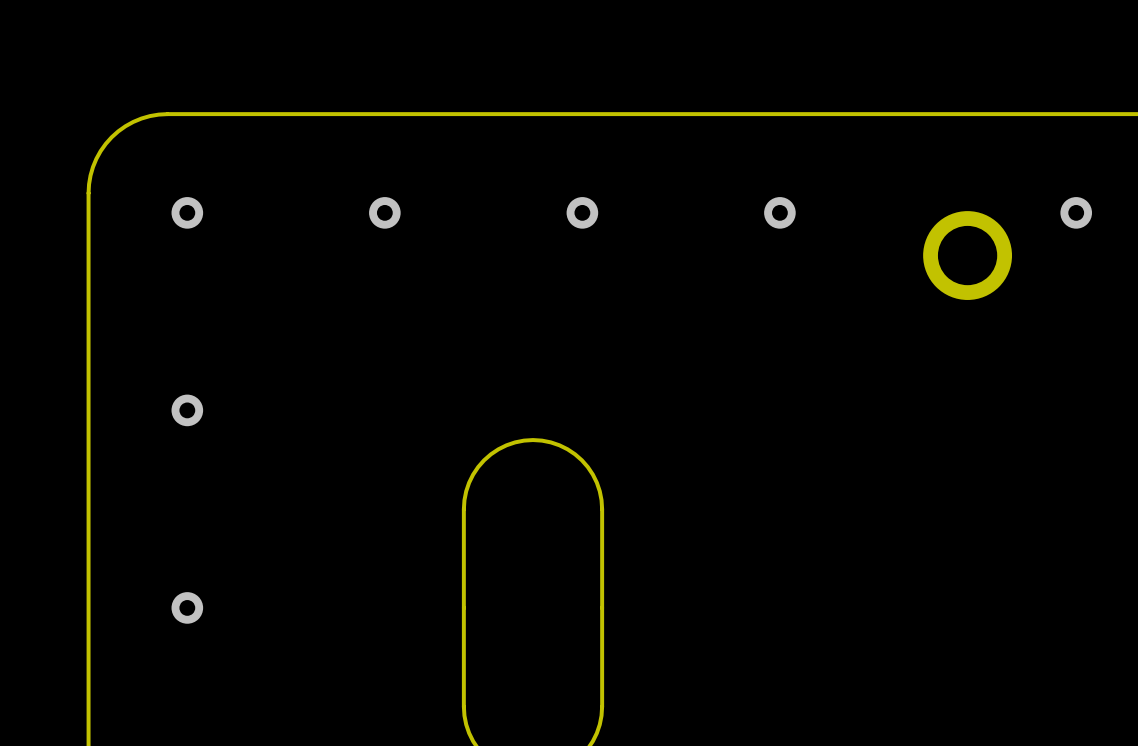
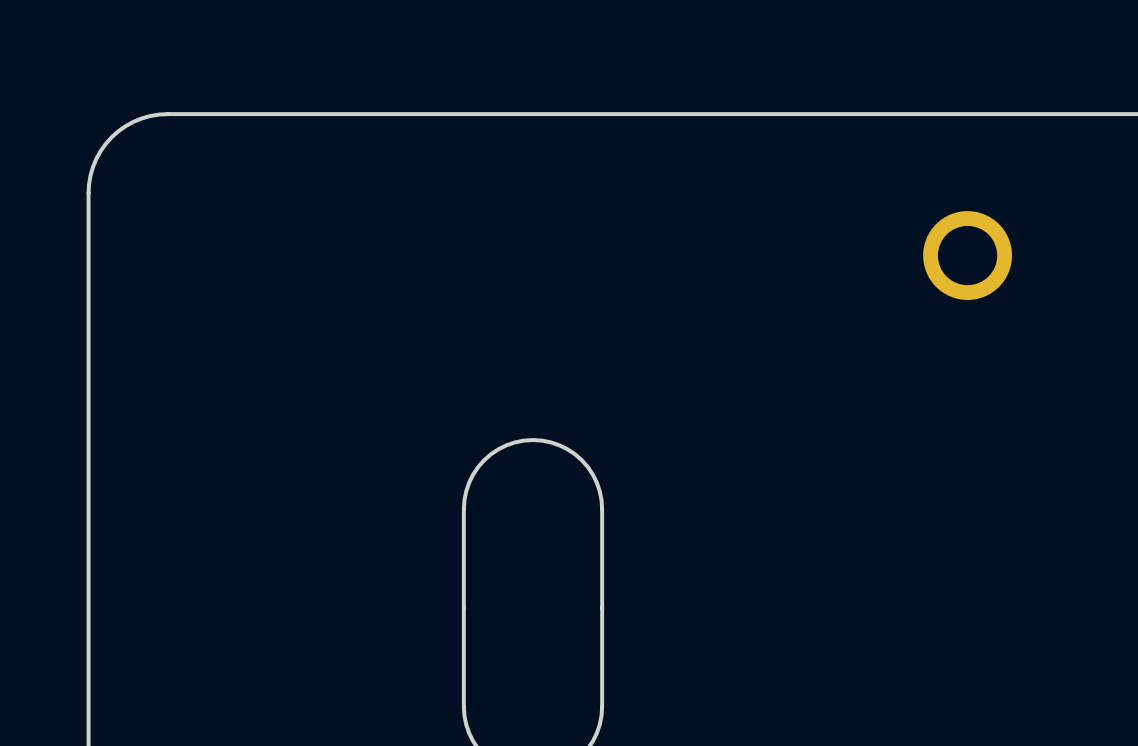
via: (187, 212) -> none
via: (384, 212) -> none
via: (582, 212) -> none
via: (779, 212) -> none
via: (1076, 212) -> none
via: (187, 410) -> none
via: (187, 607) -> none

